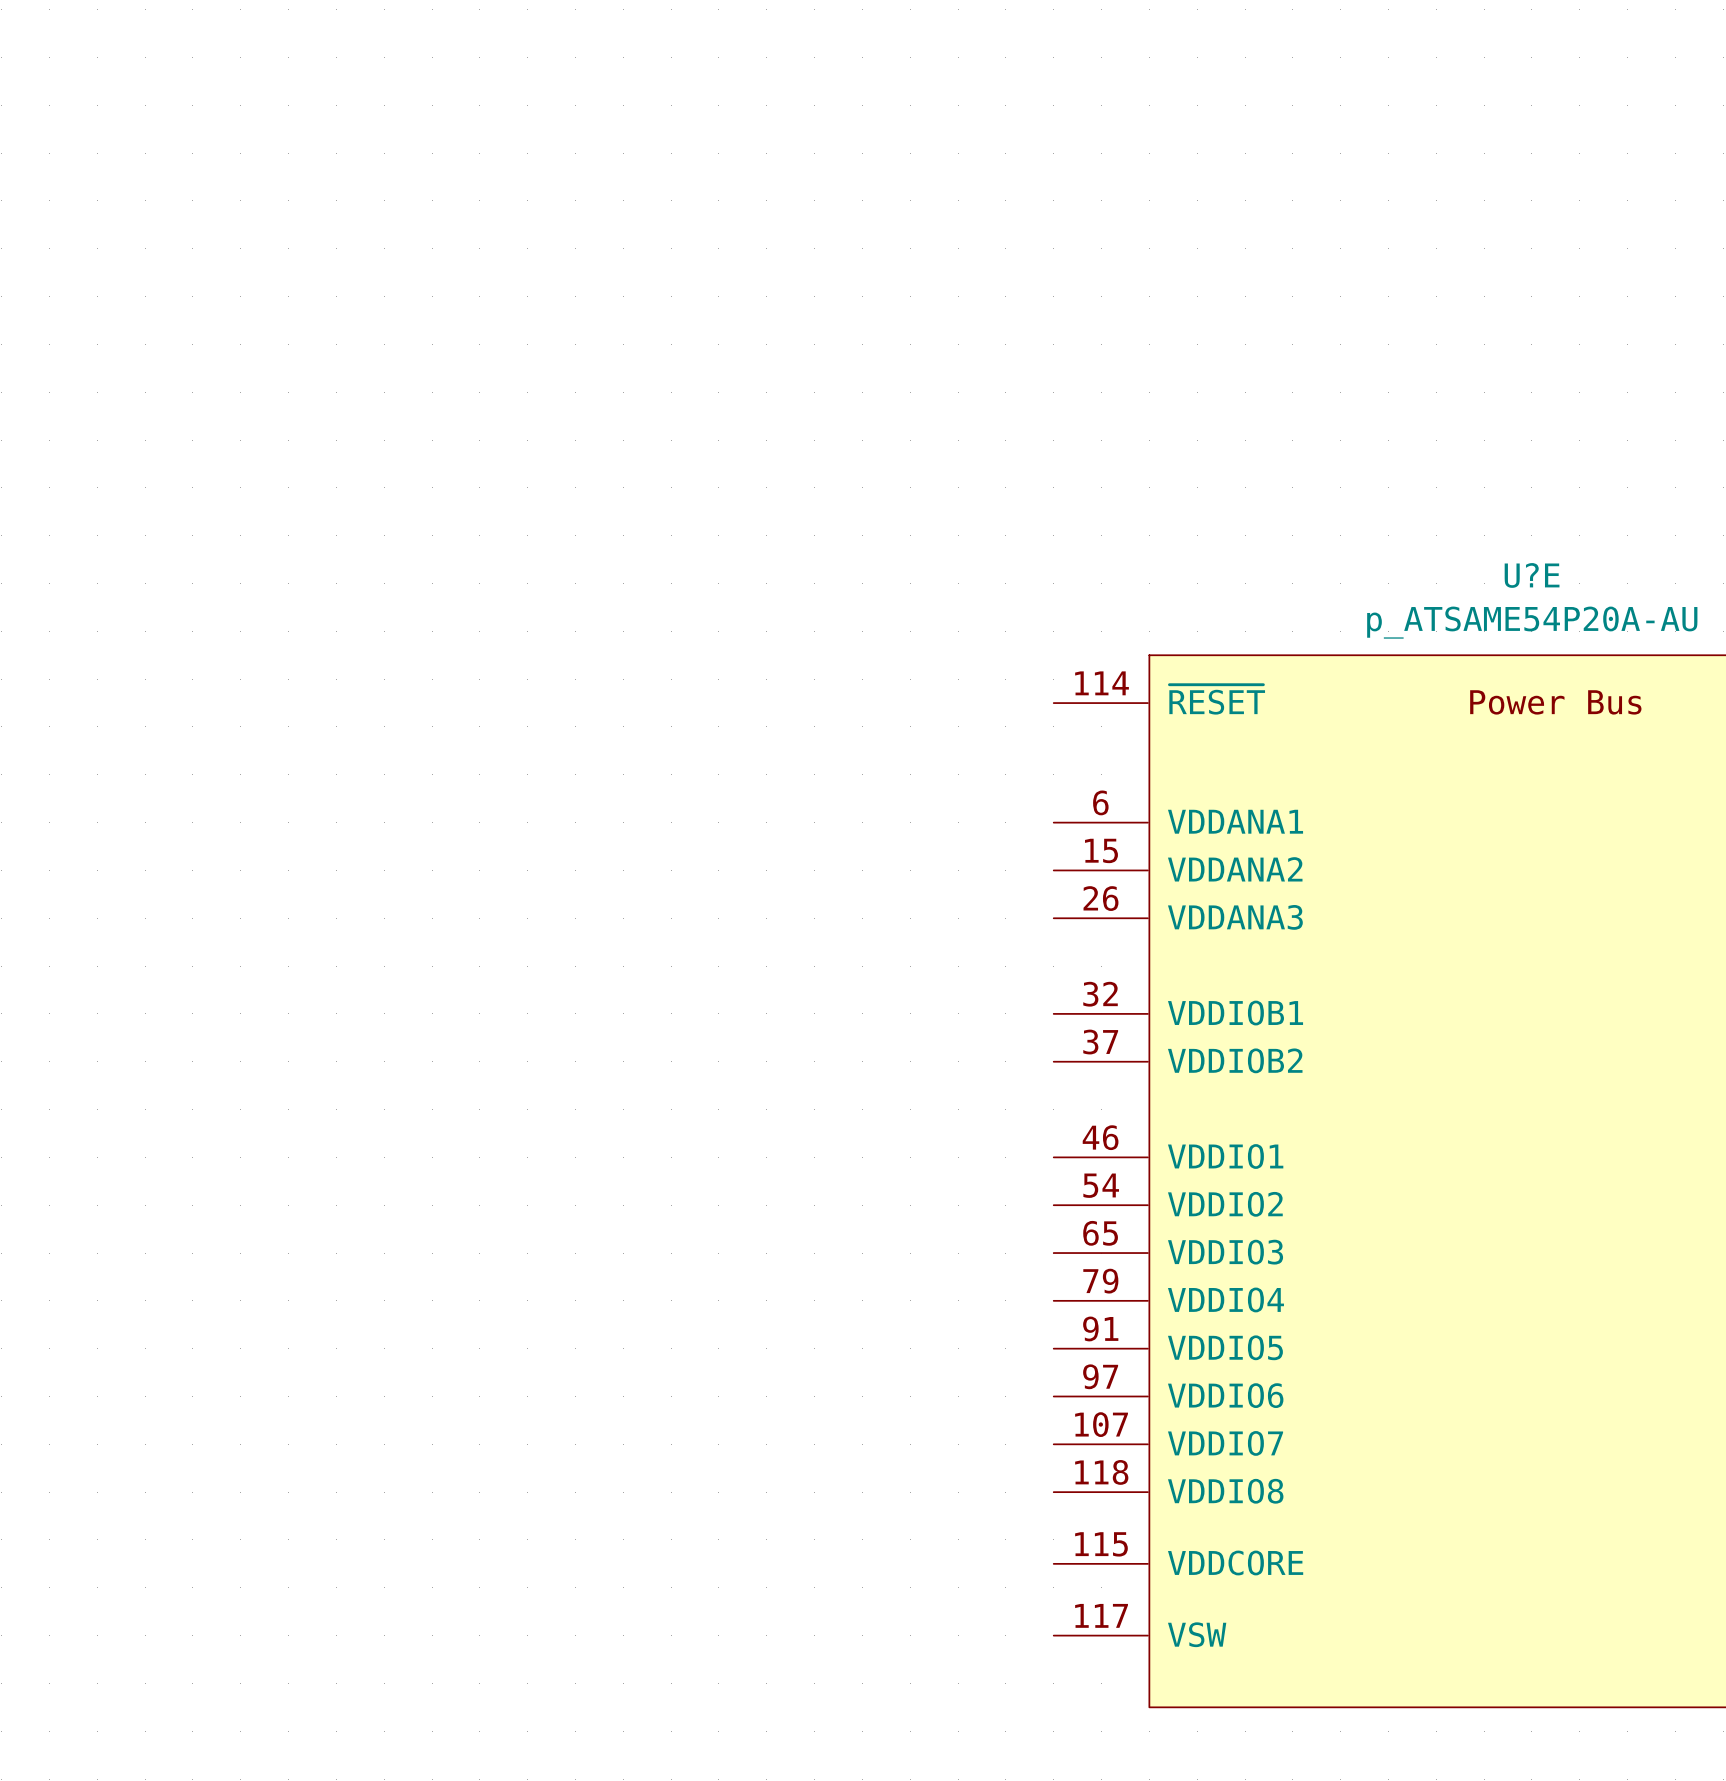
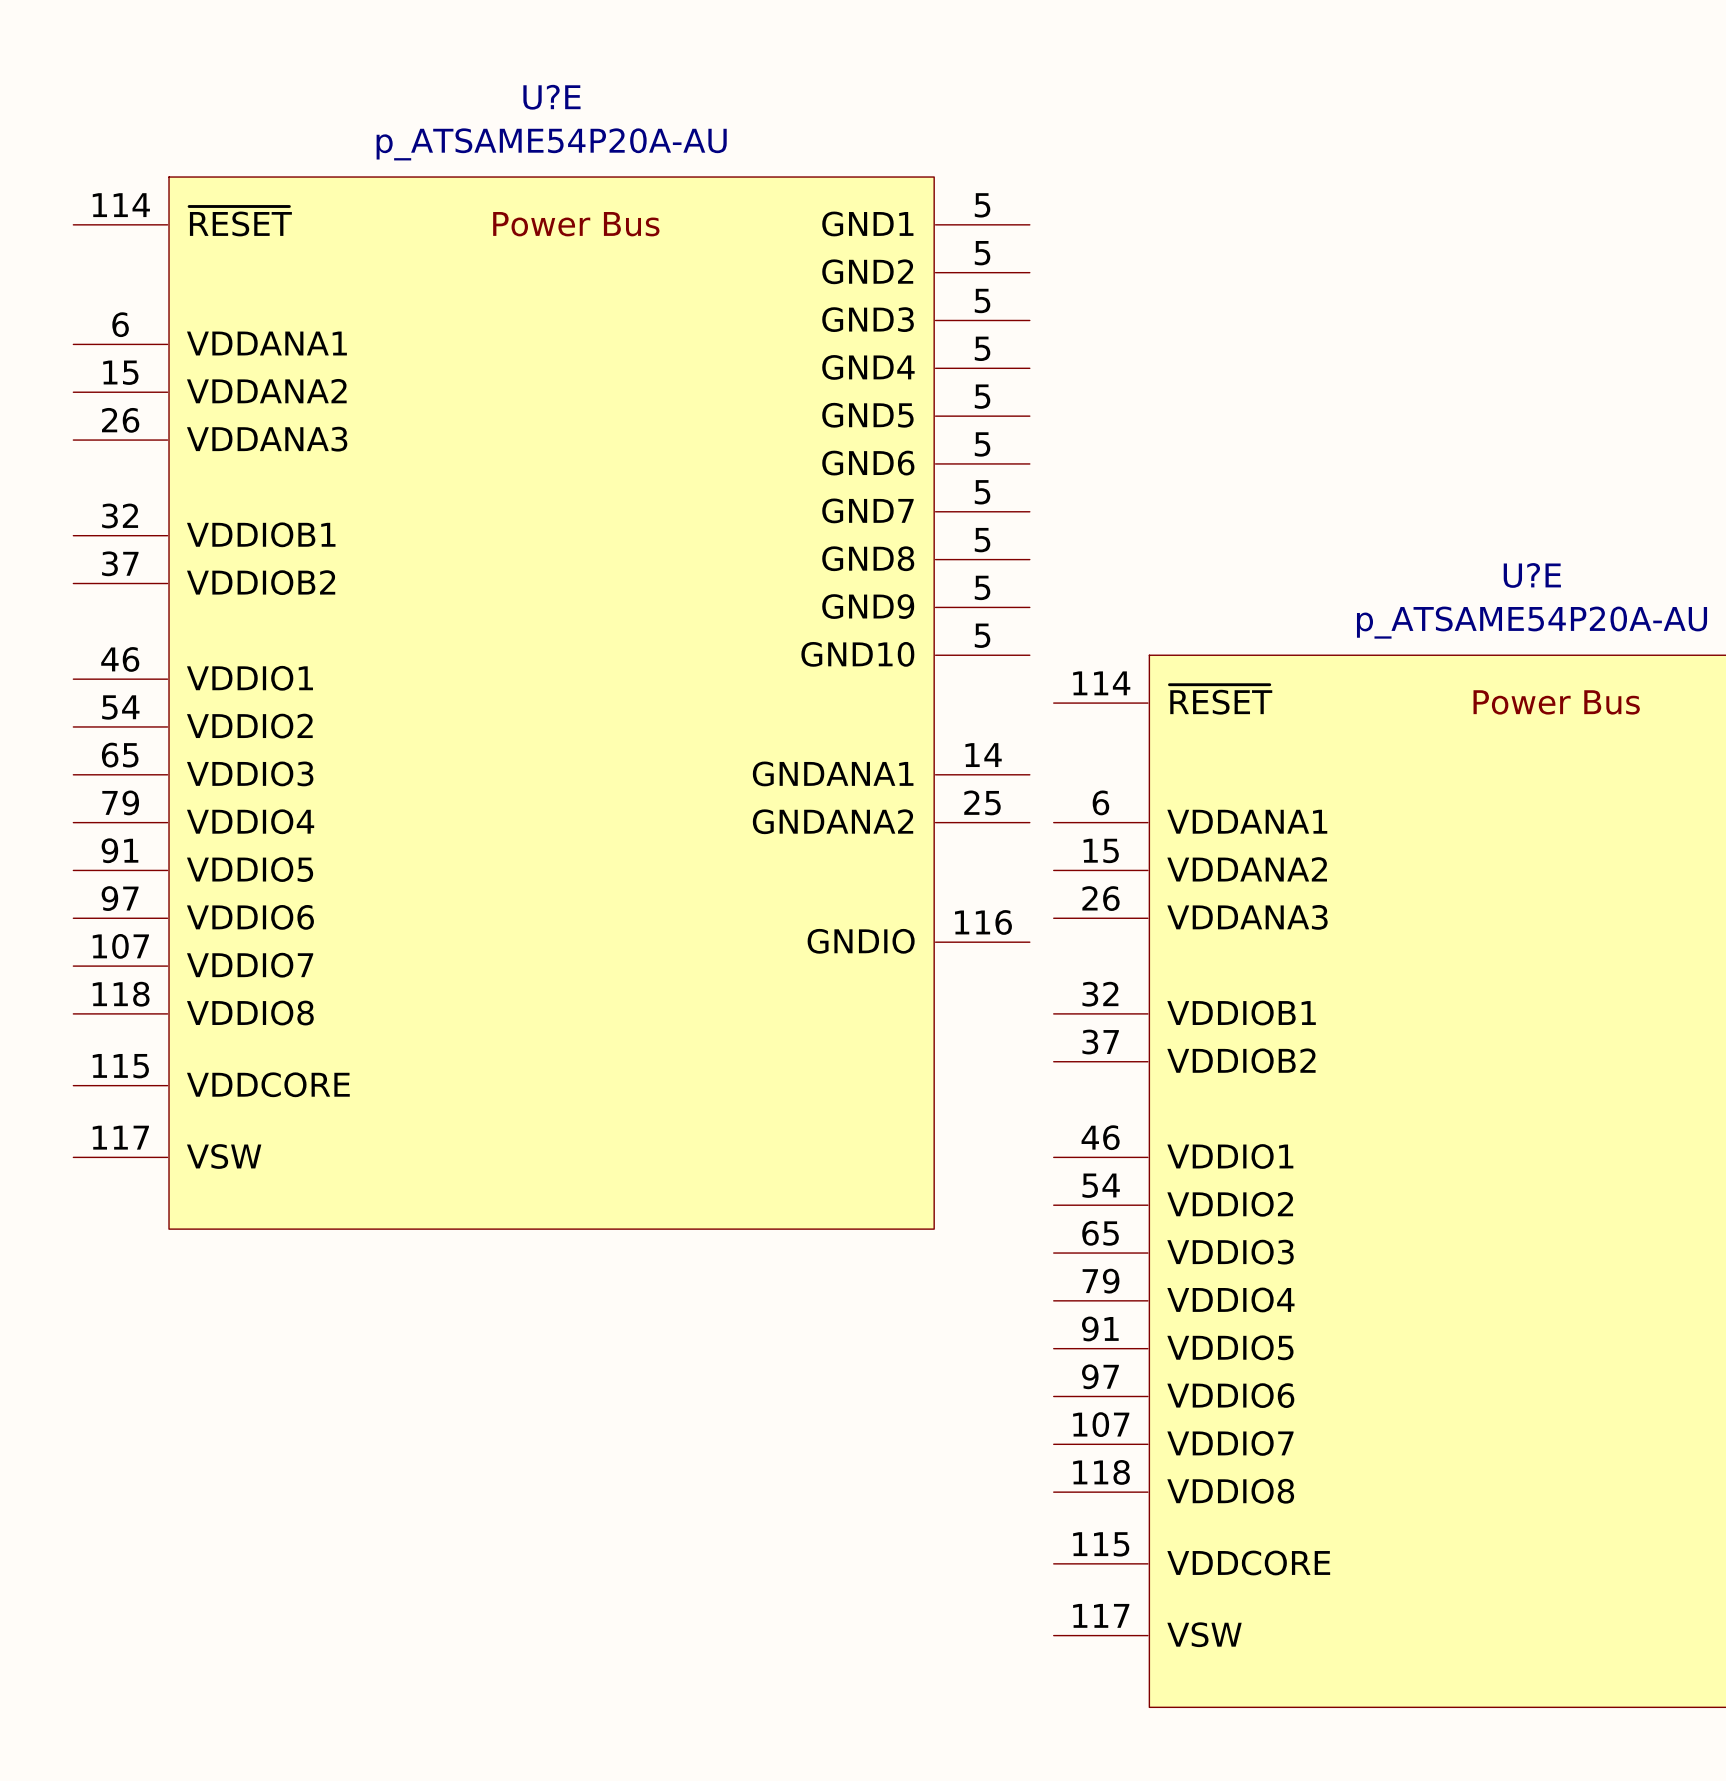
U?E: none -> p_ATSAME54P20A-AU (551, 703)

